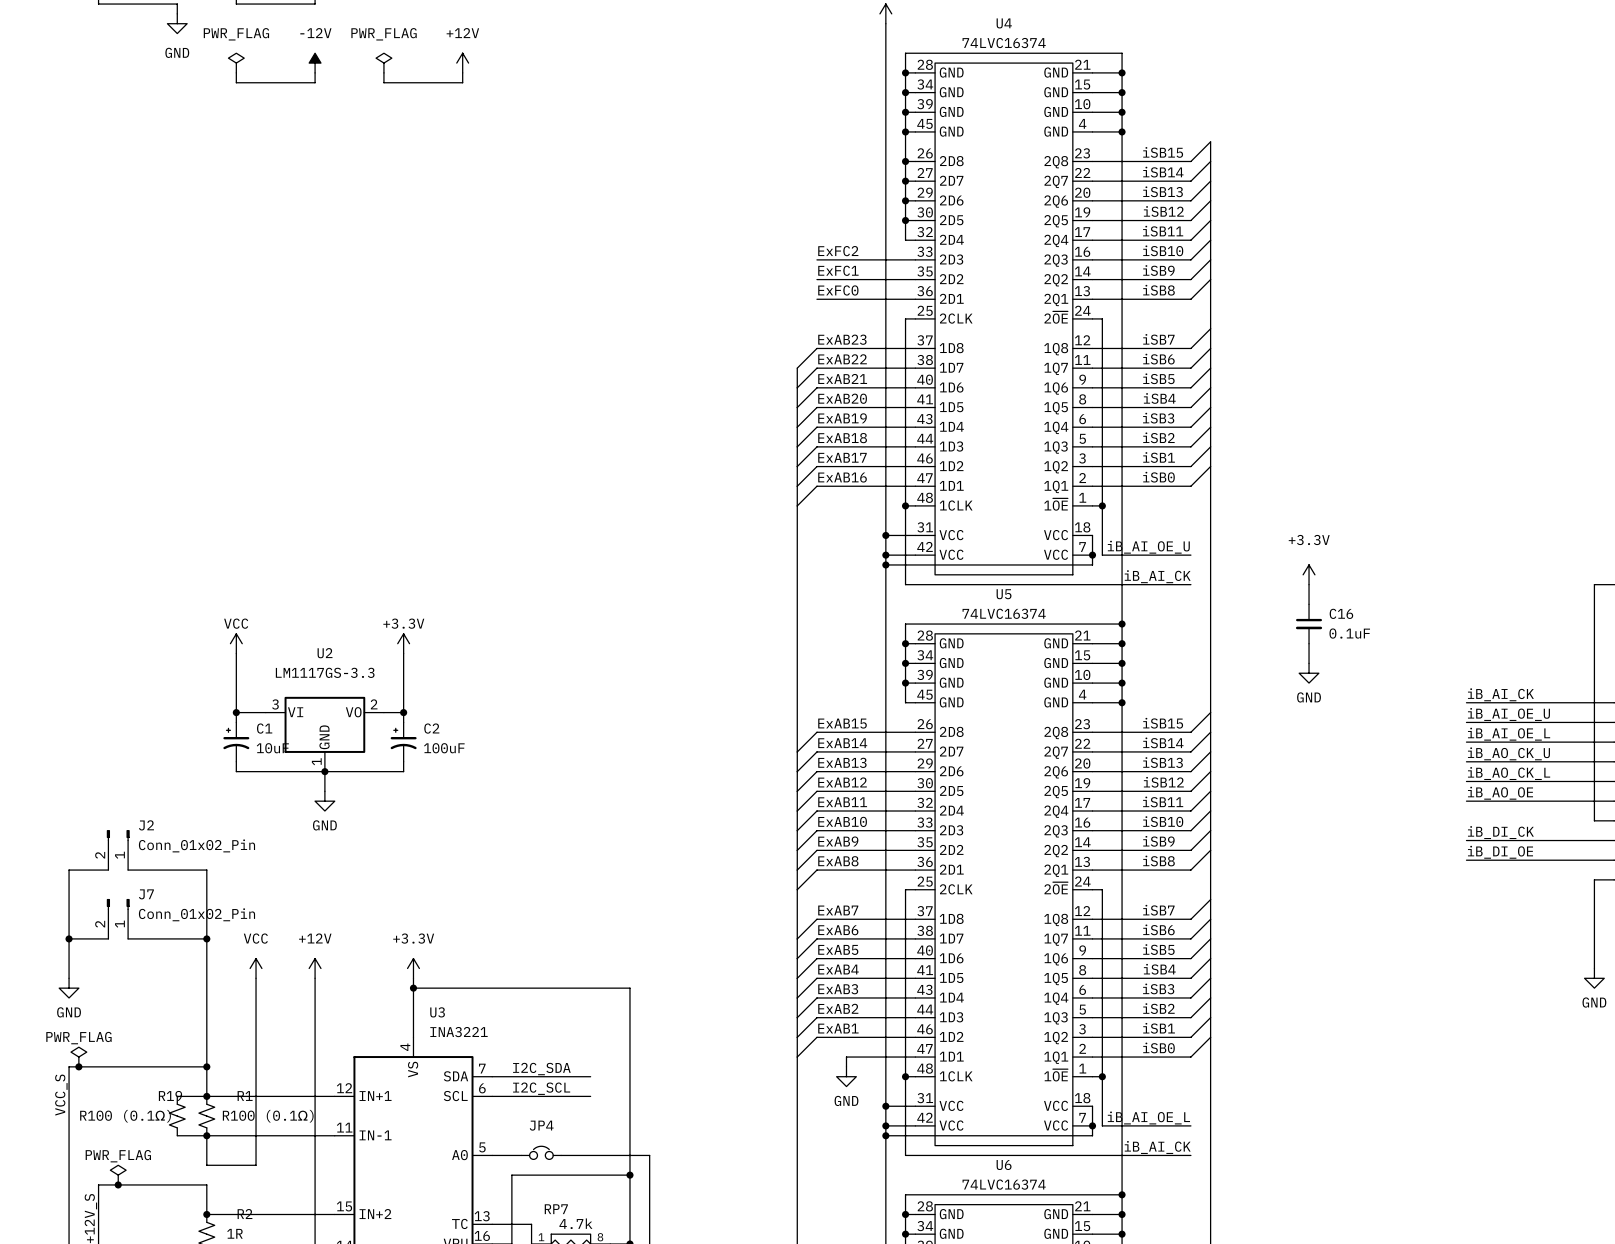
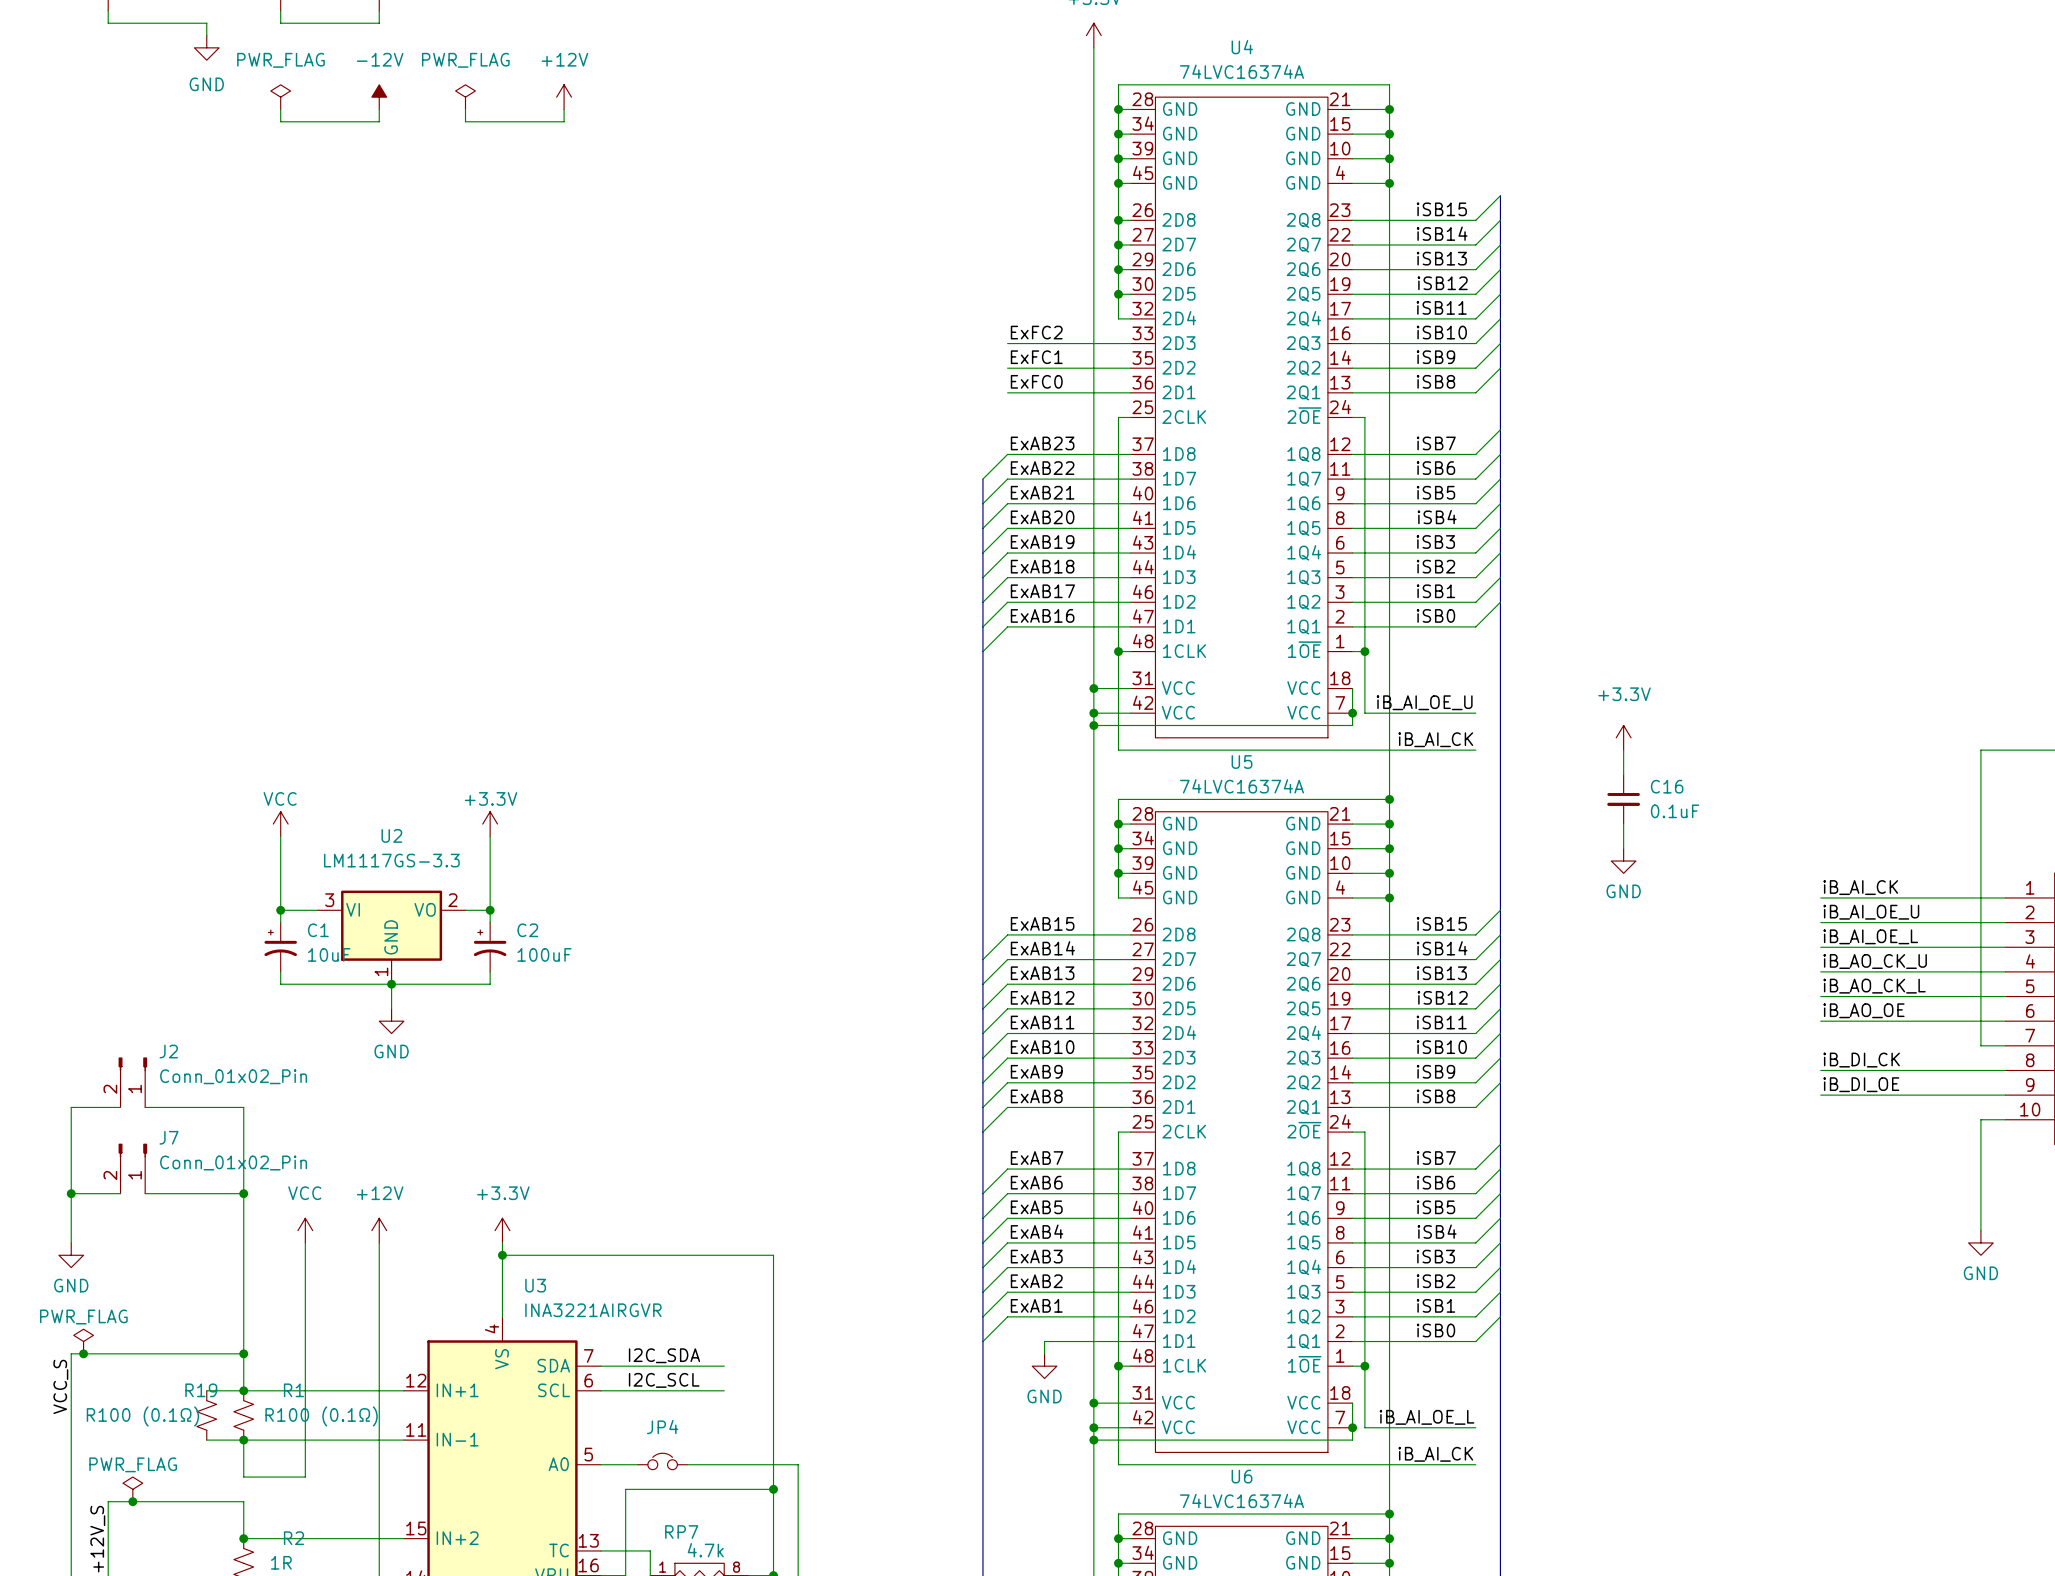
U4 value: 74LVC16374 (1004, 43) -> 74LVC16374A (1241, 71)
U5 value: 74LVC16374 (1004, 613) -> 74LVC16374A (1241, 786)
U3 value: INA3221 (458, 1032) -> INA3221AIRGVR (593, 1310)
U6 value: 74LVC16374 (1004, 1184) -> 74LVC16374A (1241, 1500)

